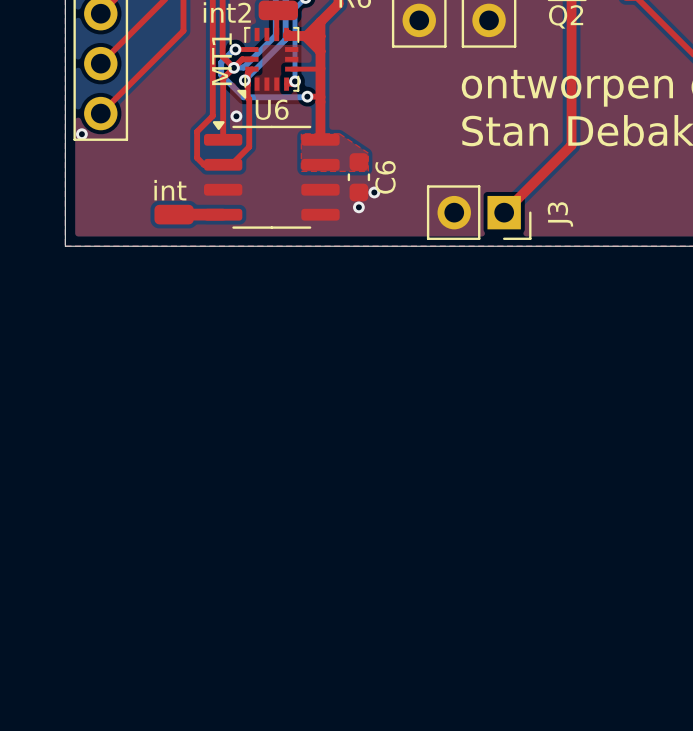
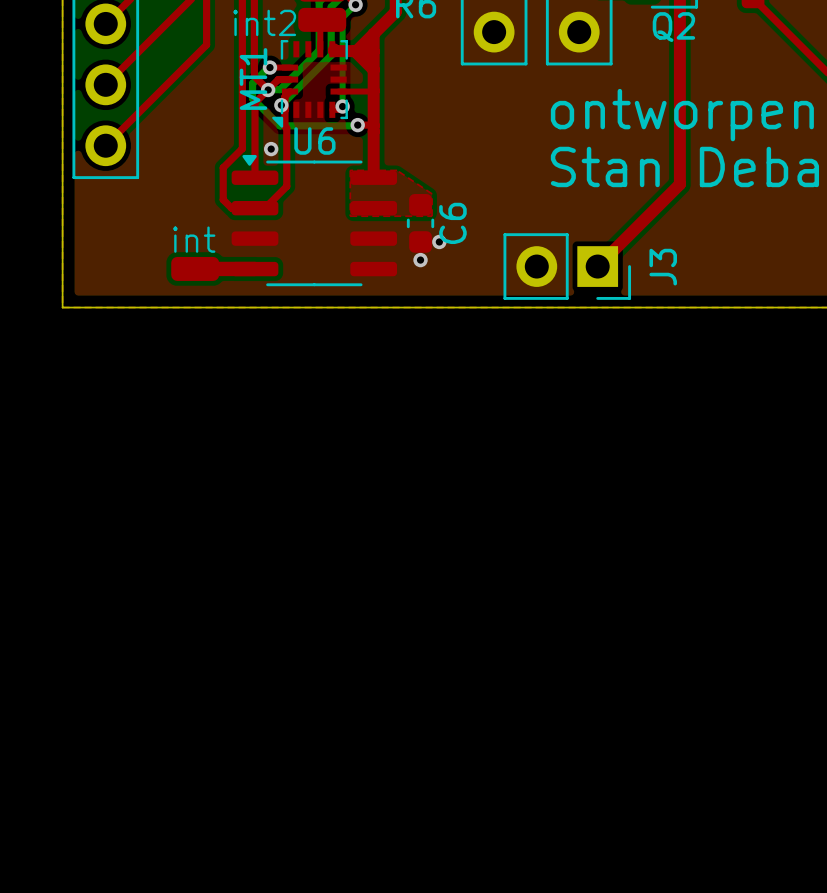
via: (81, 134) -> none

